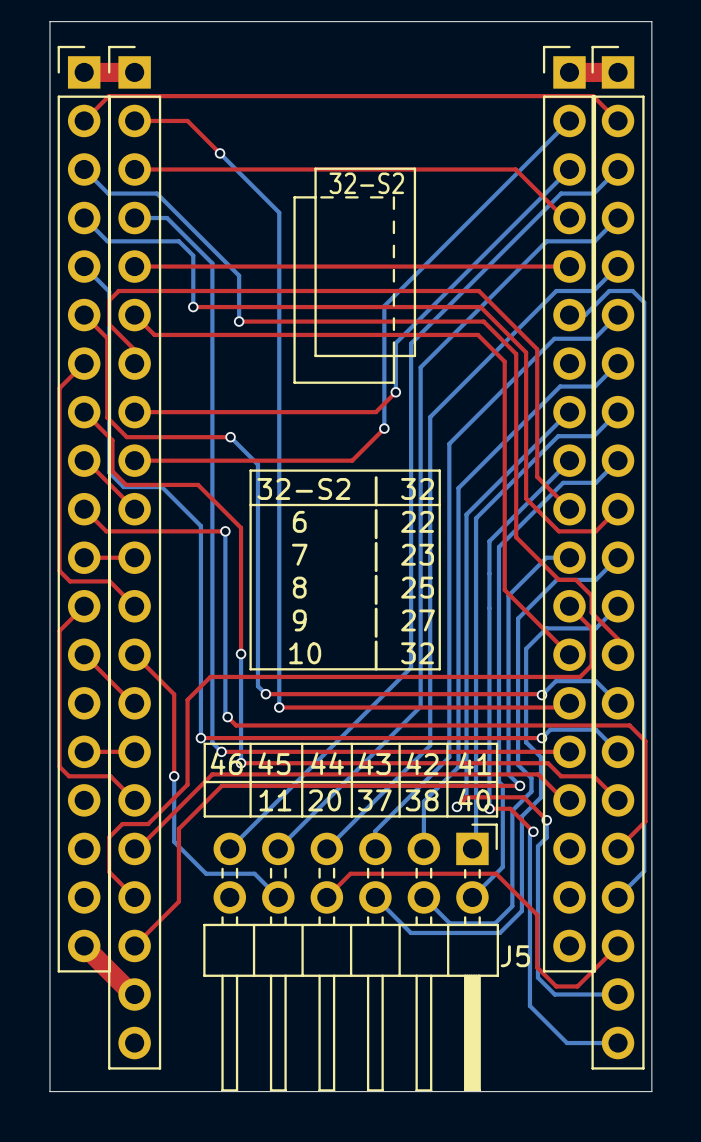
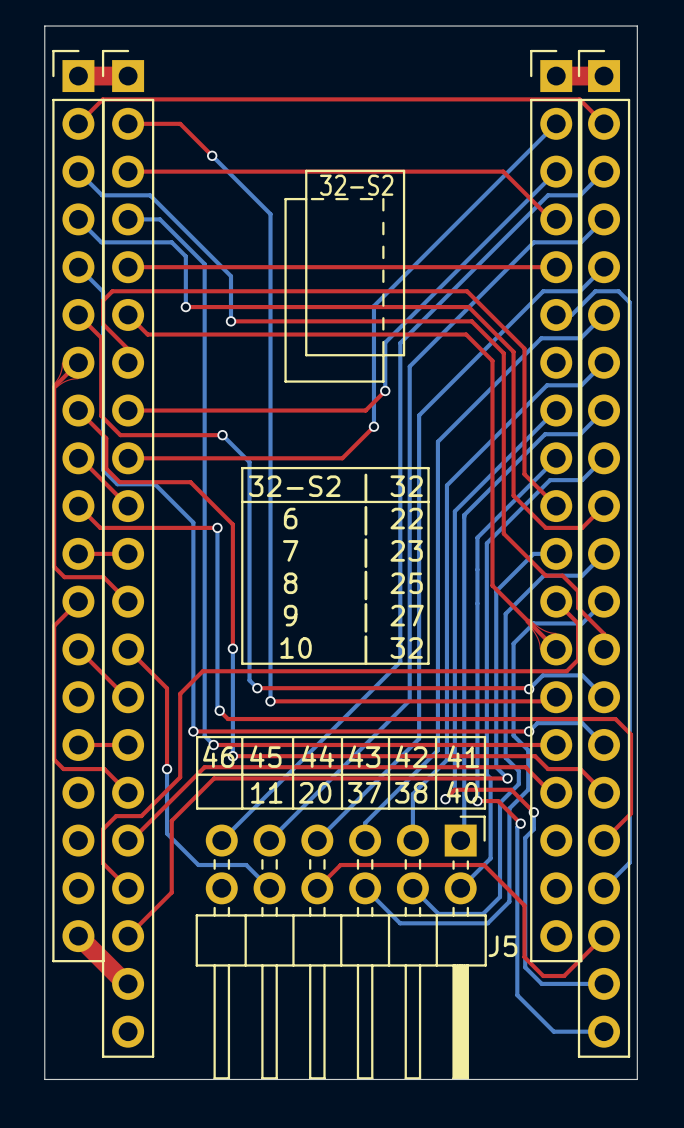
top zone outline: none -> (84, 357) (78, 378) (66, 380) (56, 387) (53, 385) (60, 374) (62, 362) (84, 357)
top zone outline: none -> (528, 619) (542, 629) (556, 633) (561, 655) (540, 649) (536, 636) (525, 621) (528, 619)

